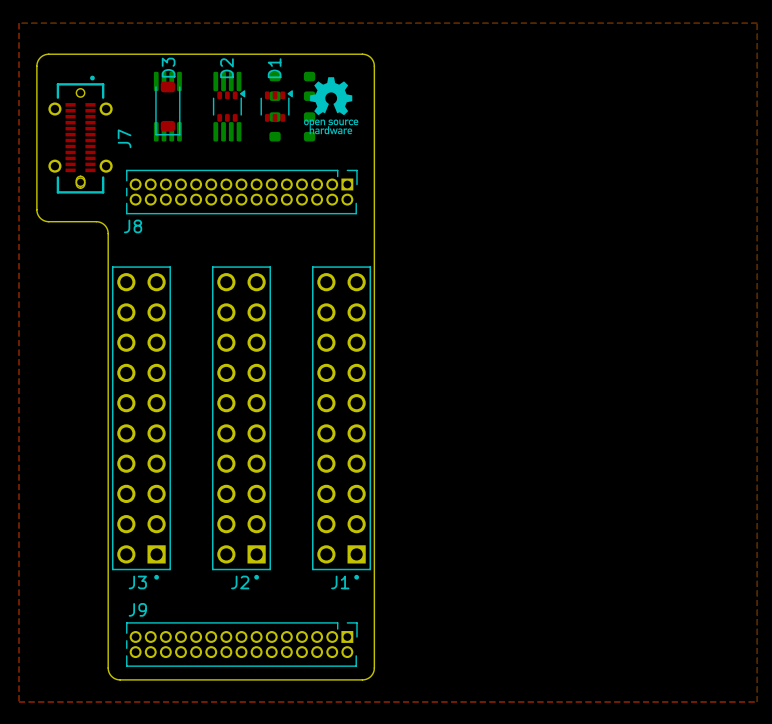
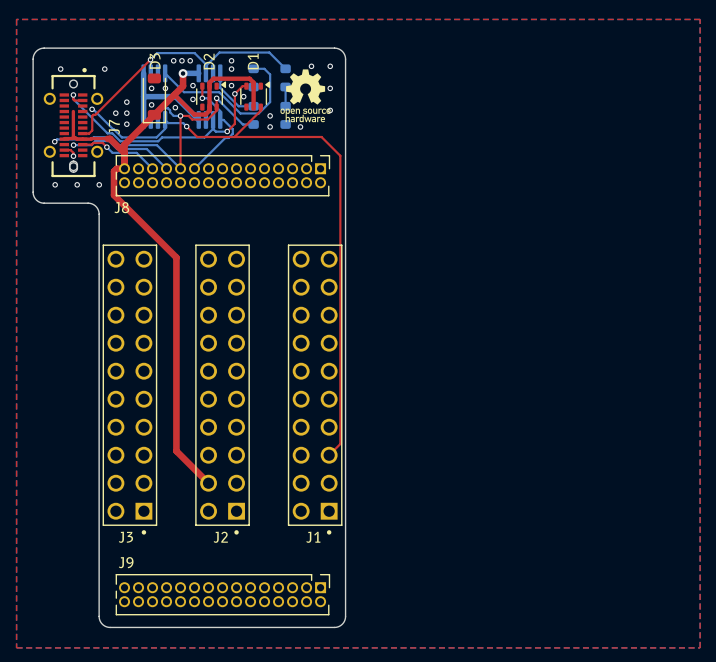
top track: none -> (150, 59) (92, 116) (92, 130) (89, 133) (82, 133)
via: none -> (150, 59)
via: none -> (173, 60)
via: none -> (181, 60)
via: none -> (190, 60)
via: none -> (231, 60)
bottom track: none -> (205, 66) (219, 52) (269, 52) (285, 68)
via: none -> (311, 66)
via: none -> (330, 66)
via: none -> (60, 69)
via: none -> (104, 69)
via: none -> (231, 69)
bottom track: none -> (253, 68) (264, 68) (270, 74) (270, 102) (258, 113) (240, 113) (219, 92) (184, 92) (165, 73)
bottom track: none -> (143, 73) (143, 119)
bottom track: none -> (150, 73) (150, 59) (157, 53) (194, 53) (205, 64) (205, 73)
top track: none -> (183, 73) (183, 86) (124, 144) (124, 168) (116, 168) (114, 171) (114, 195) (176, 257) (176, 451) (208, 483)
bottom track: none -> (183, 73) (198, 73)
via: none -> (183, 73)
bottom track: none -> (220, 73) (220, 87) (238, 106) (253, 106)
via: none -> (192, 85)
via: none -> (231, 85)
top track: none -> (202, 86) (202, 98)
top track: none -> (246, 86) (242, 86) (234, 93) (234, 123) (227, 131)
bottom track: none -> (285, 86) (285, 106)
via: none -> (151, 88)
via: none -> (165, 88)
via: none -> (330, 88)
via: none -> (234, 93)
top track: none -> (73, 94) (74, 100) (82, 100)
bottom track: none -> (73, 94) (73, 99) (107, 133) (112, 133) (120, 141) (158, 141) (162, 137) (204, 137) (213, 128)
via: none -> (73, 94)
top track: none -> (174, 94) (194, 114) (205, 114) (209, 110) (209, 82) (213, 78) (249, 78) (253, 82) (253, 107)
bottom track: none -> (143, 96) (175, 96) (198, 119)
via: none -> (243, 96)
bottom track: none -> (202, 98) (207, 98) (220, 110) (220, 119) (223, 119) (232, 129) (232, 133) (228, 137) (225, 137) (194, 168)
via: none -> (202, 98)
top track: none -> (216, 98) (216, 110) (207, 119) (192, 119) (188, 115) (180, 115) (180, 168)
bottom track: none -> (216, 98) (242, 124) (253, 124)
via: none -> (216, 98)
via: none -> (192, 99)
via: none -> (126, 102)
via: none -> (151, 104)
top track: none -> (260, 107) (260, 110) (234, 136)
via: none -> (175, 107)
bottom track: none -> (92, 109) (121, 137) (156, 137) (165, 128) (165, 119) (168, 123) (183, 123) (186, 126)
via: none -> (92, 109)
via: none -> (330, 110)
top track: none -> (73, 111) (73, 137) (64, 139)
via: none -> (115, 113)
via: none -> (126, 113)
bottom track: none -> (180, 115) (173, 115) (167, 108) (160, 108) (157, 110) (157, 119)
via: none -> (180, 115)
via: none -> (270, 115)
via: none -> (126, 124)
top track: none -> (186, 126) (197, 136) (321, 136) (340, 155) (340, 444) (329, 455)
via: none -> (186, 126)
via: none -> (270, 126)
via: none -> (300, 126)
bottom track: none -> (213, 128) (215, 131) (227, 131)
via: none -> (227, 131)
top track: none -> (73, 137) (110, 138) (124, 153)
bottom track: none -> (54, 141) (57, 139) (110, 137) (118, 145) (156, 145) (180, 168)
via: none -> (54, 141)
top track: none -> (82, 144) (102, 142) (106, 147)
bottom track: none -> (73, 145) (91, 145) (95, 141) (109, 141) (117, 149) (146, 149) (166, 168)
via: none -> (73, 145)
bottom track: none -> (106, 147) (112, 152) (136, 152) (152, 168)
via: none -> (106, 147)
top track: none -> (64, 150) (70, 150) (73, 156)
via: none -> (73, 156)
via: none -> (55, 184)
via: none -> (77, 184)
via: none -> (99, 184)

